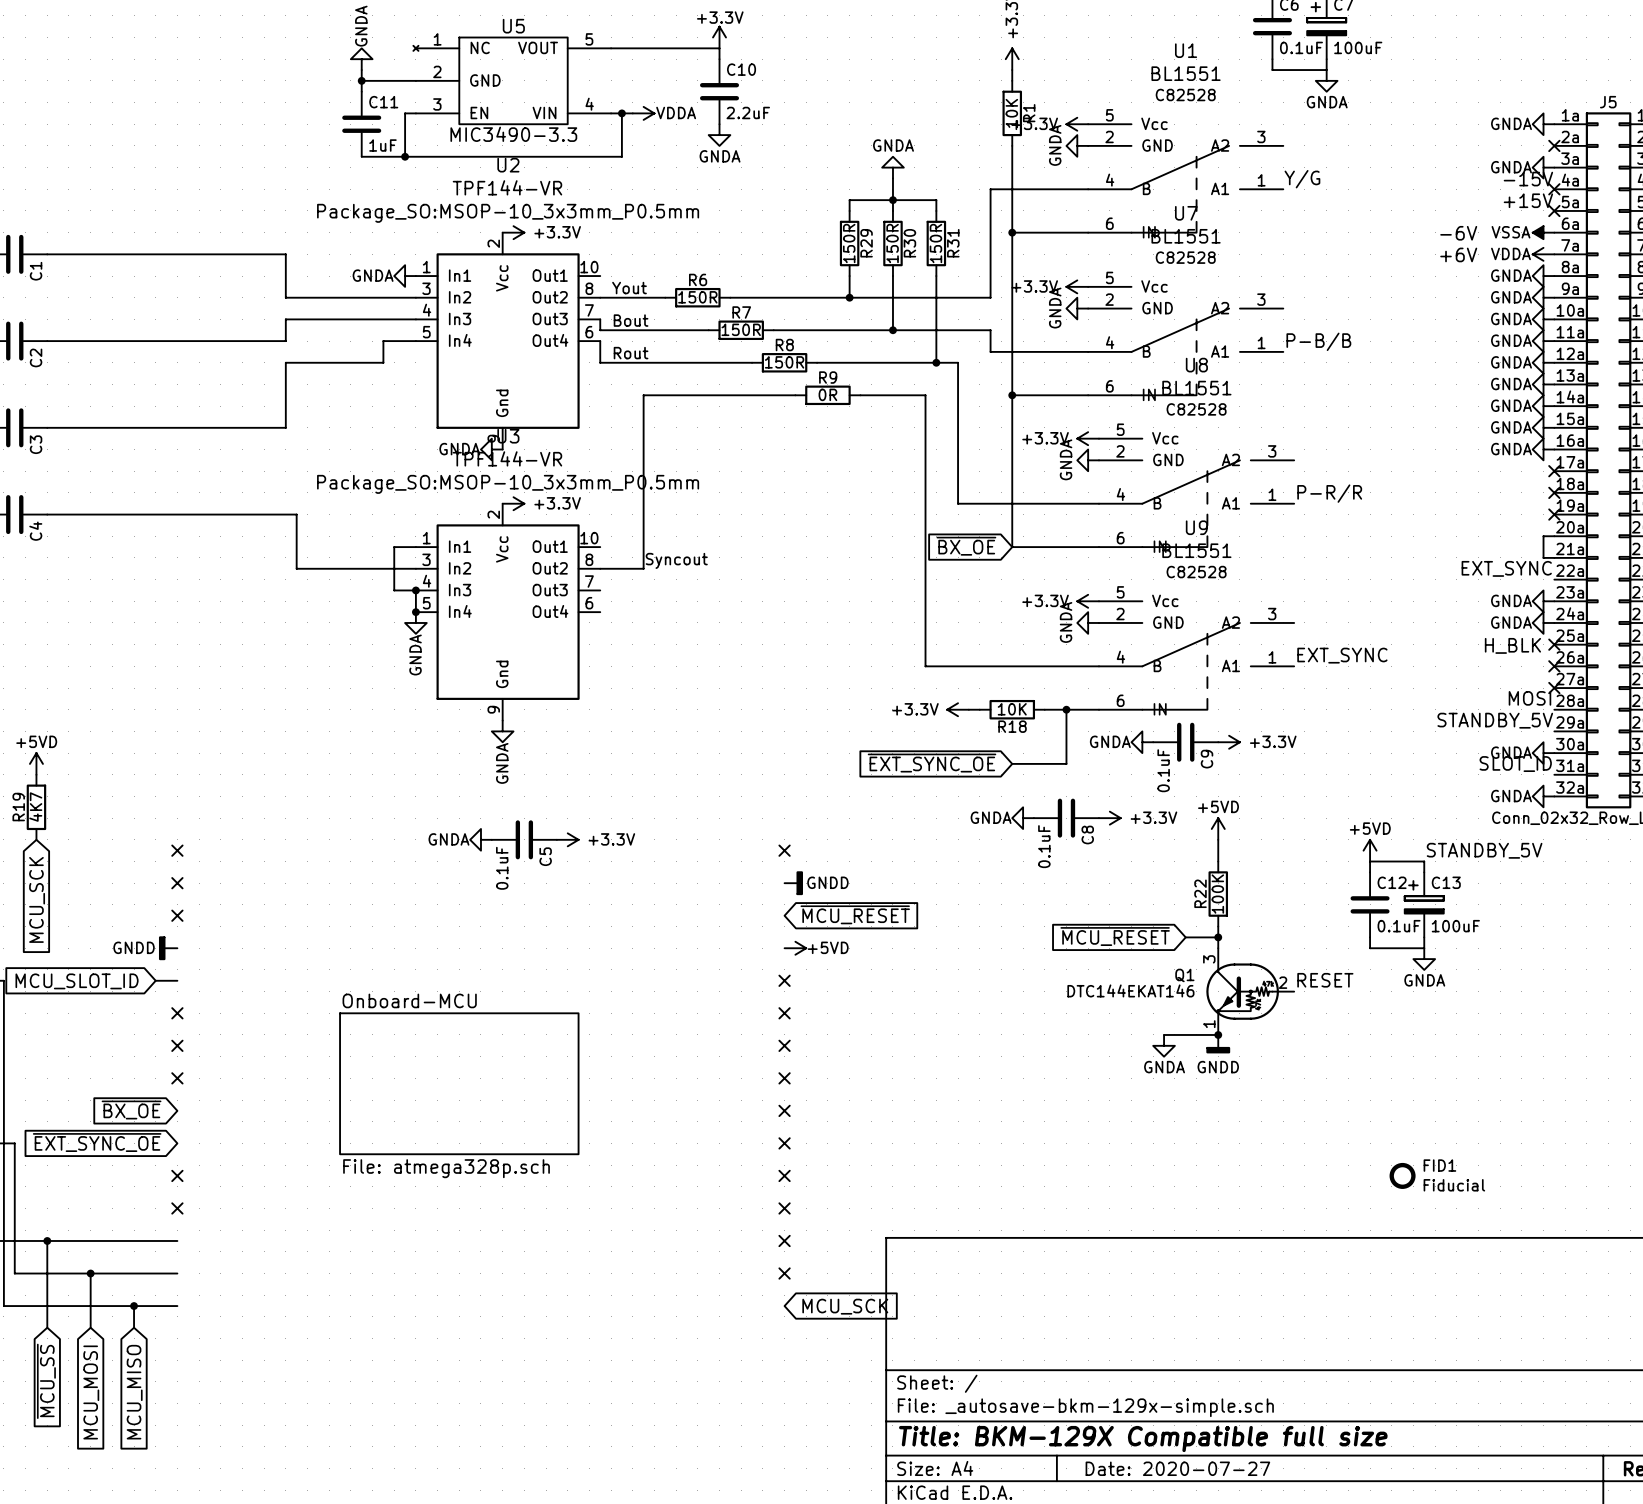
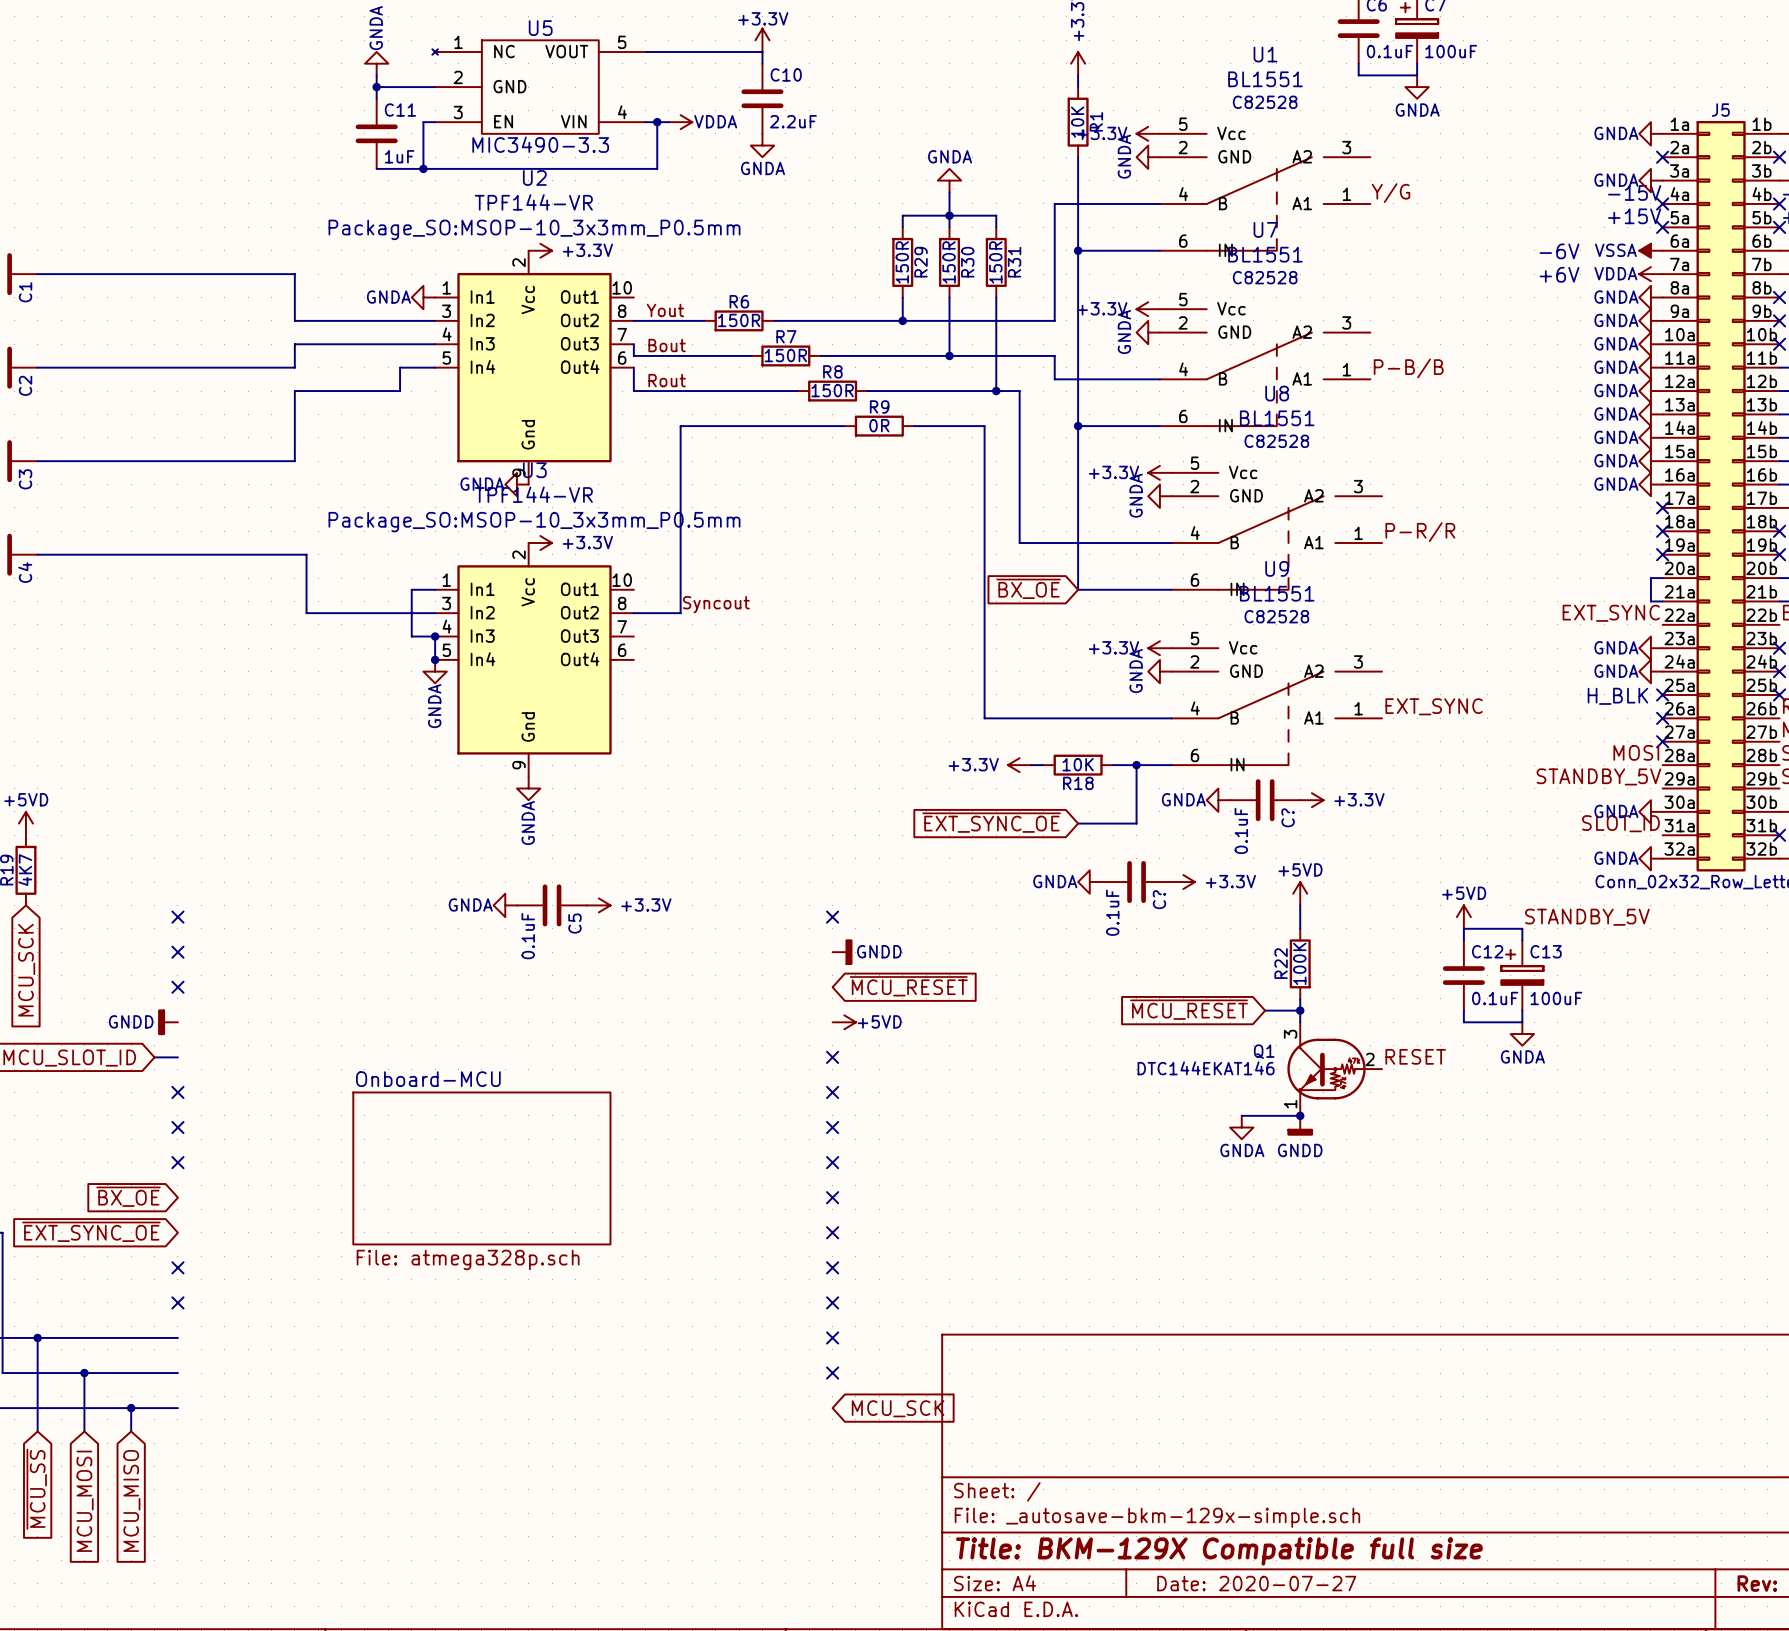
C9 name: C9 (1207, 759) -> C? (1288, 817)
C8 name: C8 (1087, 835) -> C? (1159, 899)
FID1: Fiducial (1402, 1175) -> none

